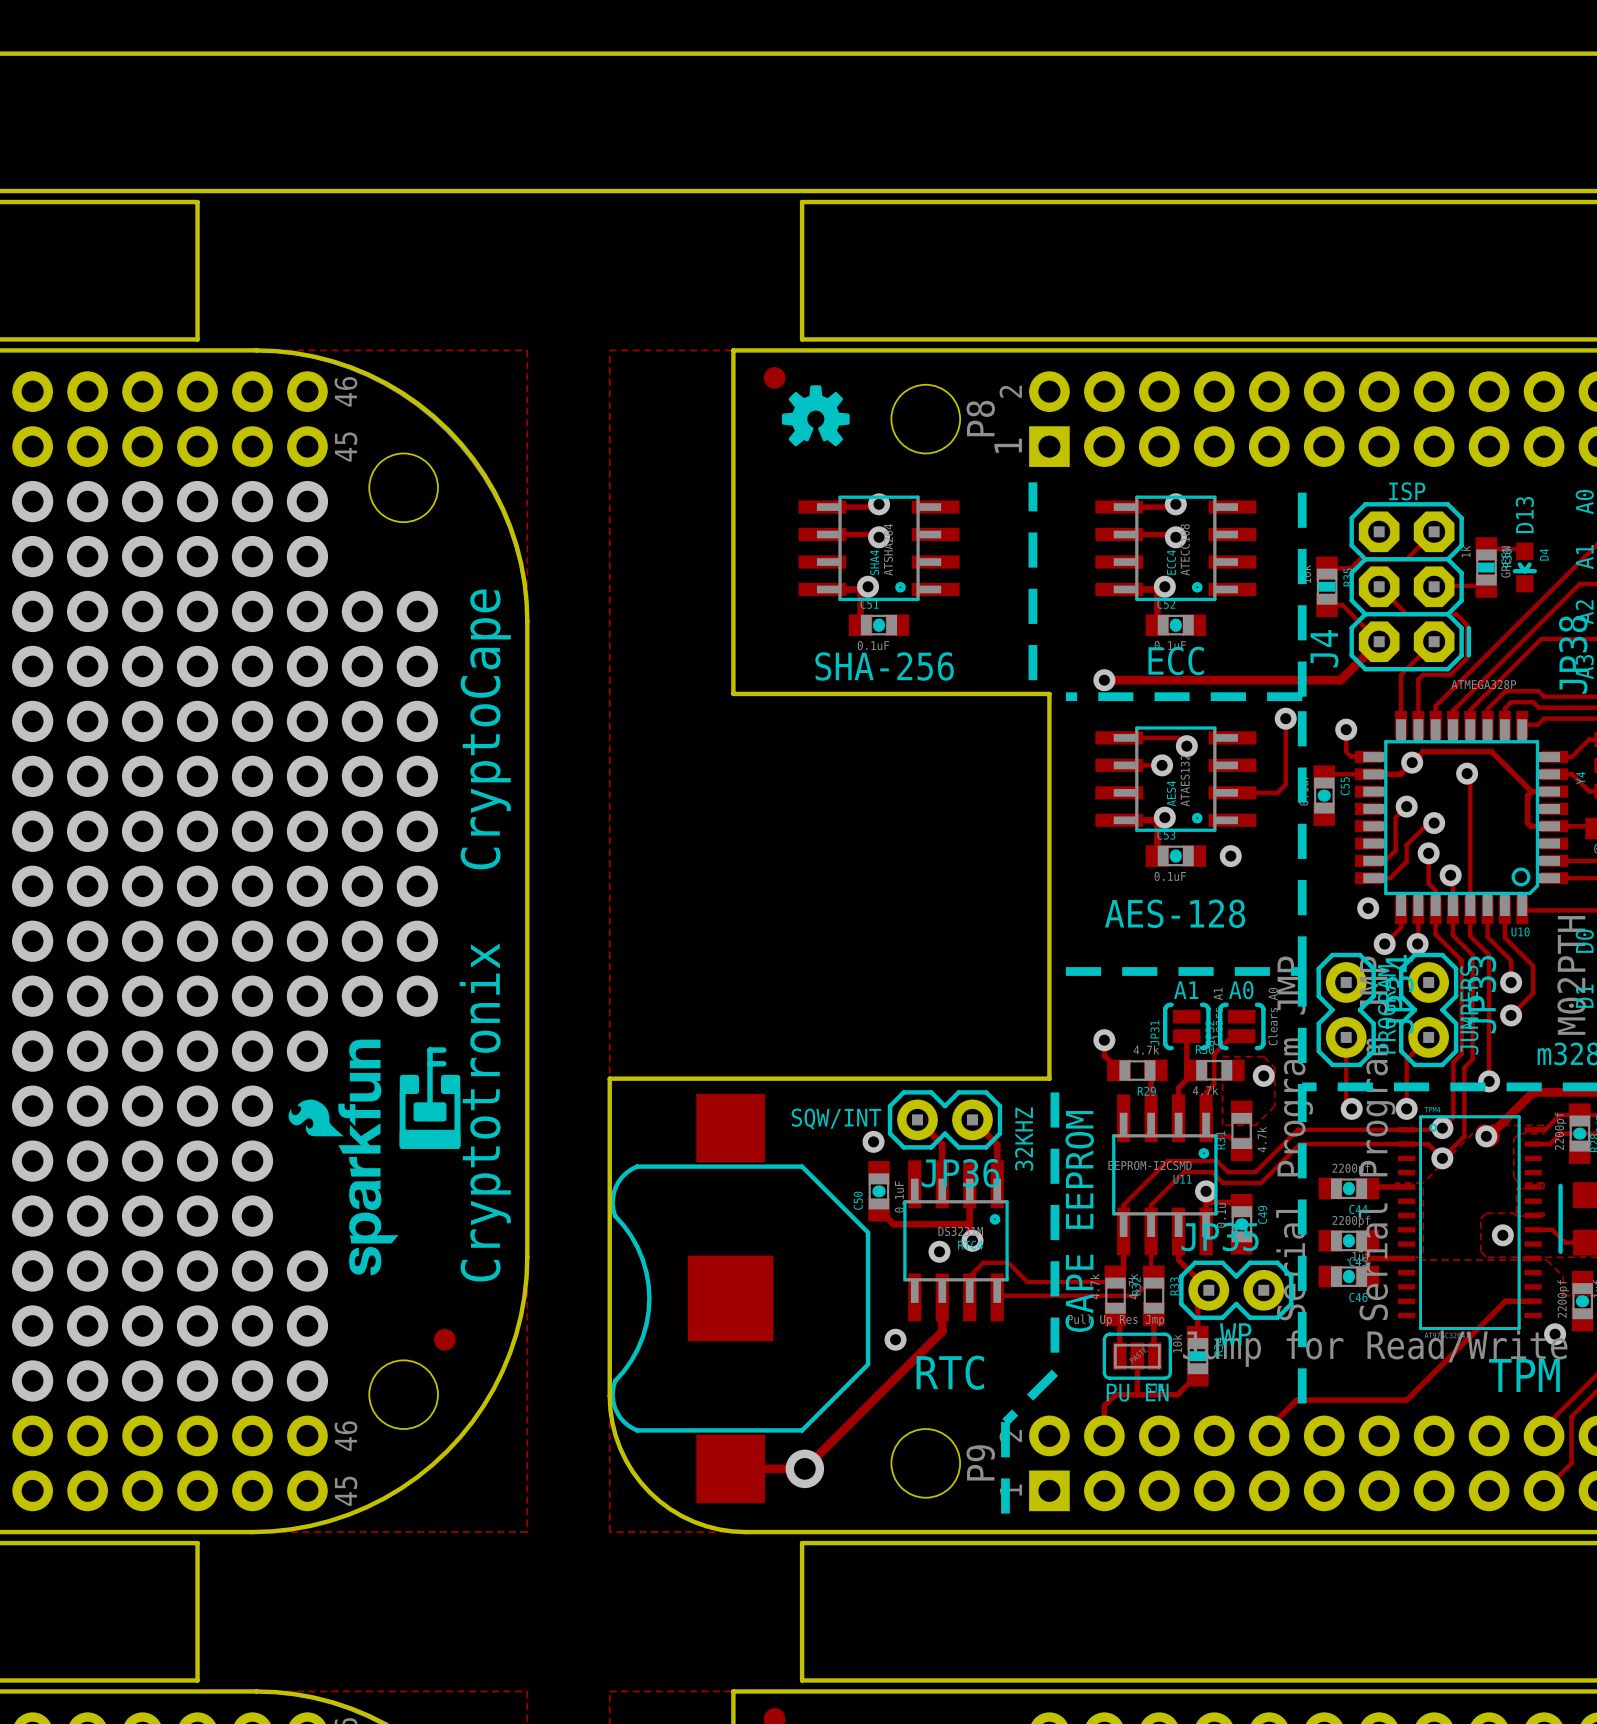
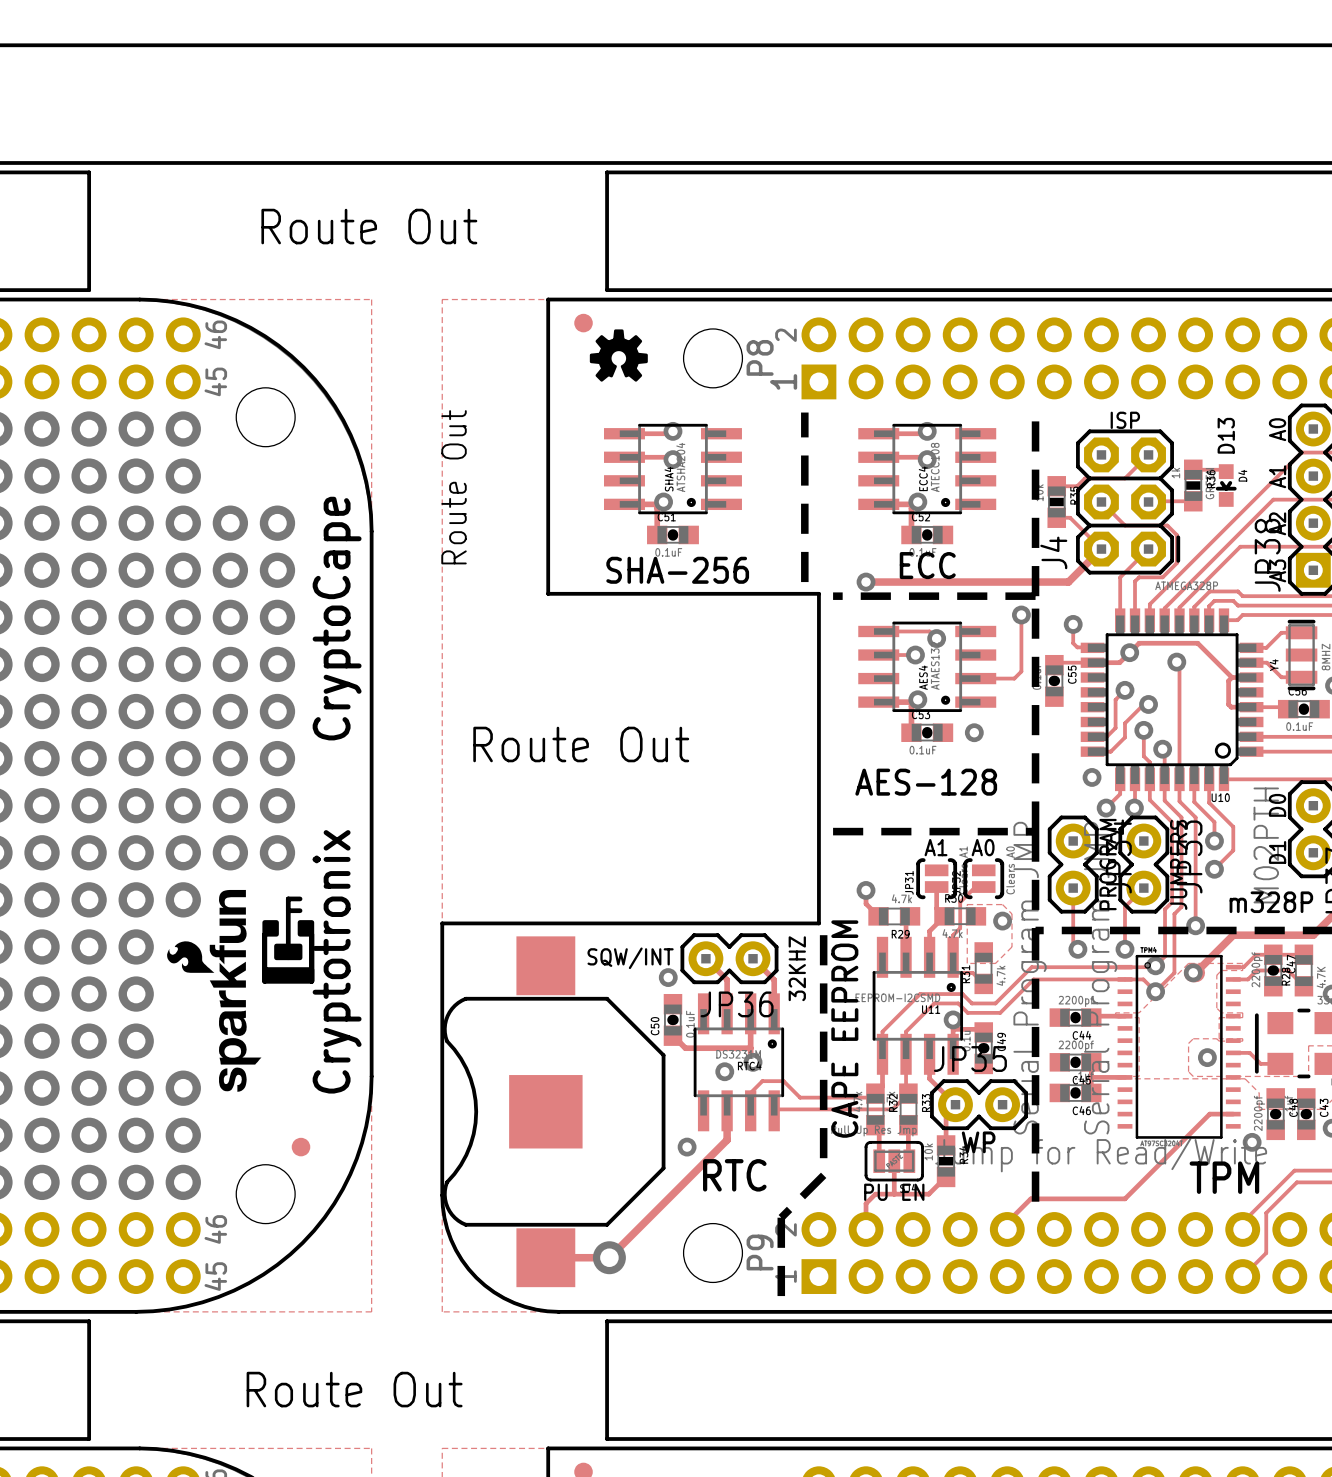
text: none -> Route Out (369, 226)
text: none -> Route Out (454, 487)
text: none -> Route Out (581, 744)
text: none -> Route Out (354, 1389)

